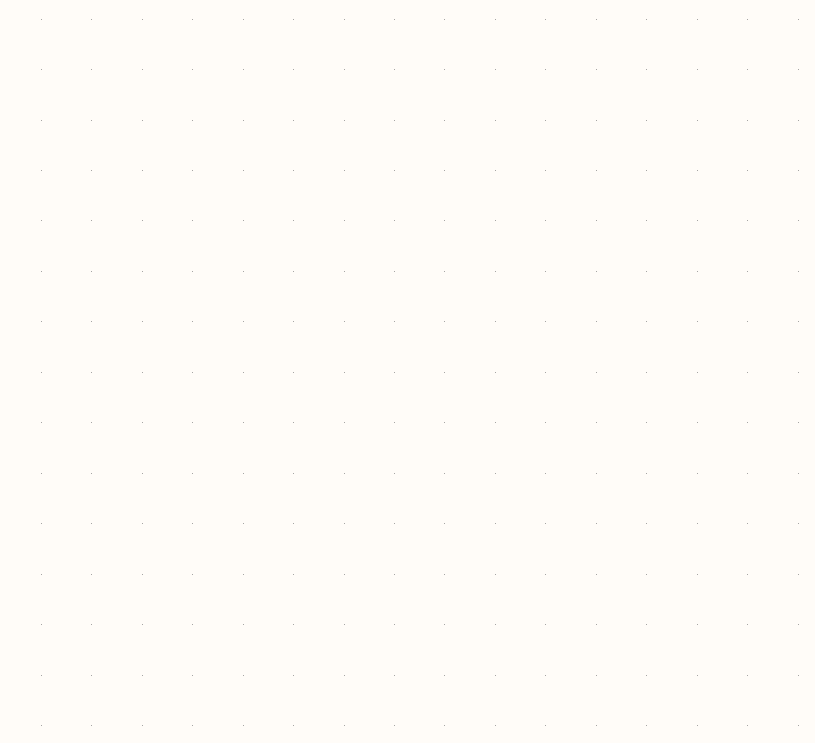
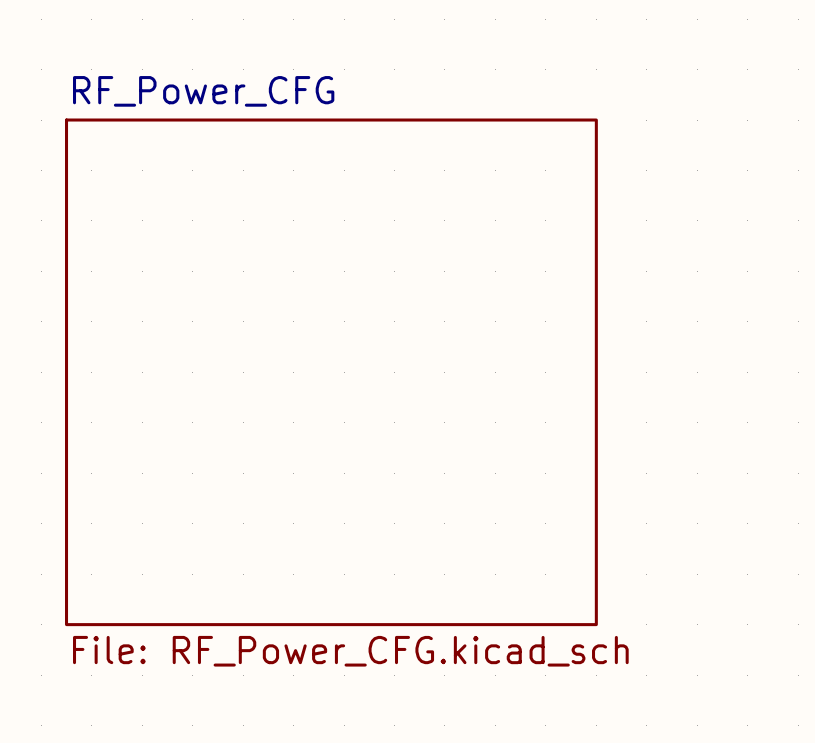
sheet RF_Power_CFG: none -> File: RF_Power_CFG.kicad_sch (331, 372)

